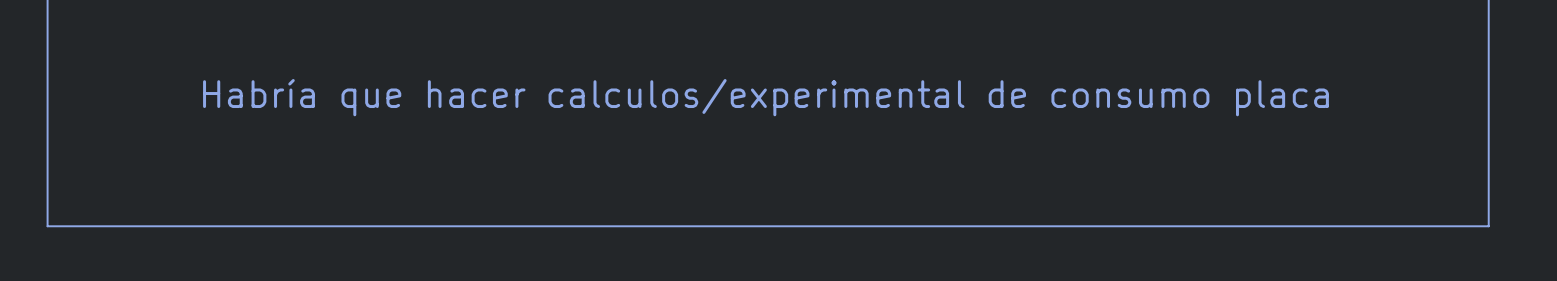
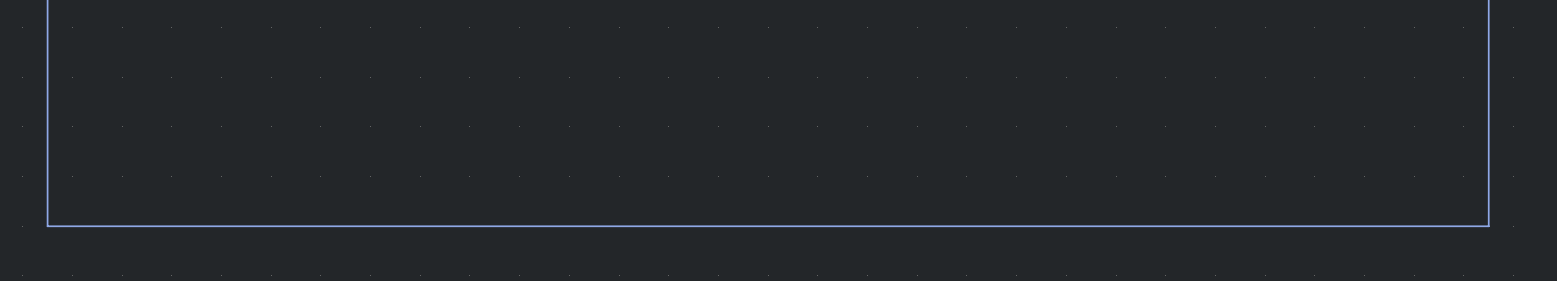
text: Habría que hacer calculos/experimental de consumo placa (765, 97) -> none

